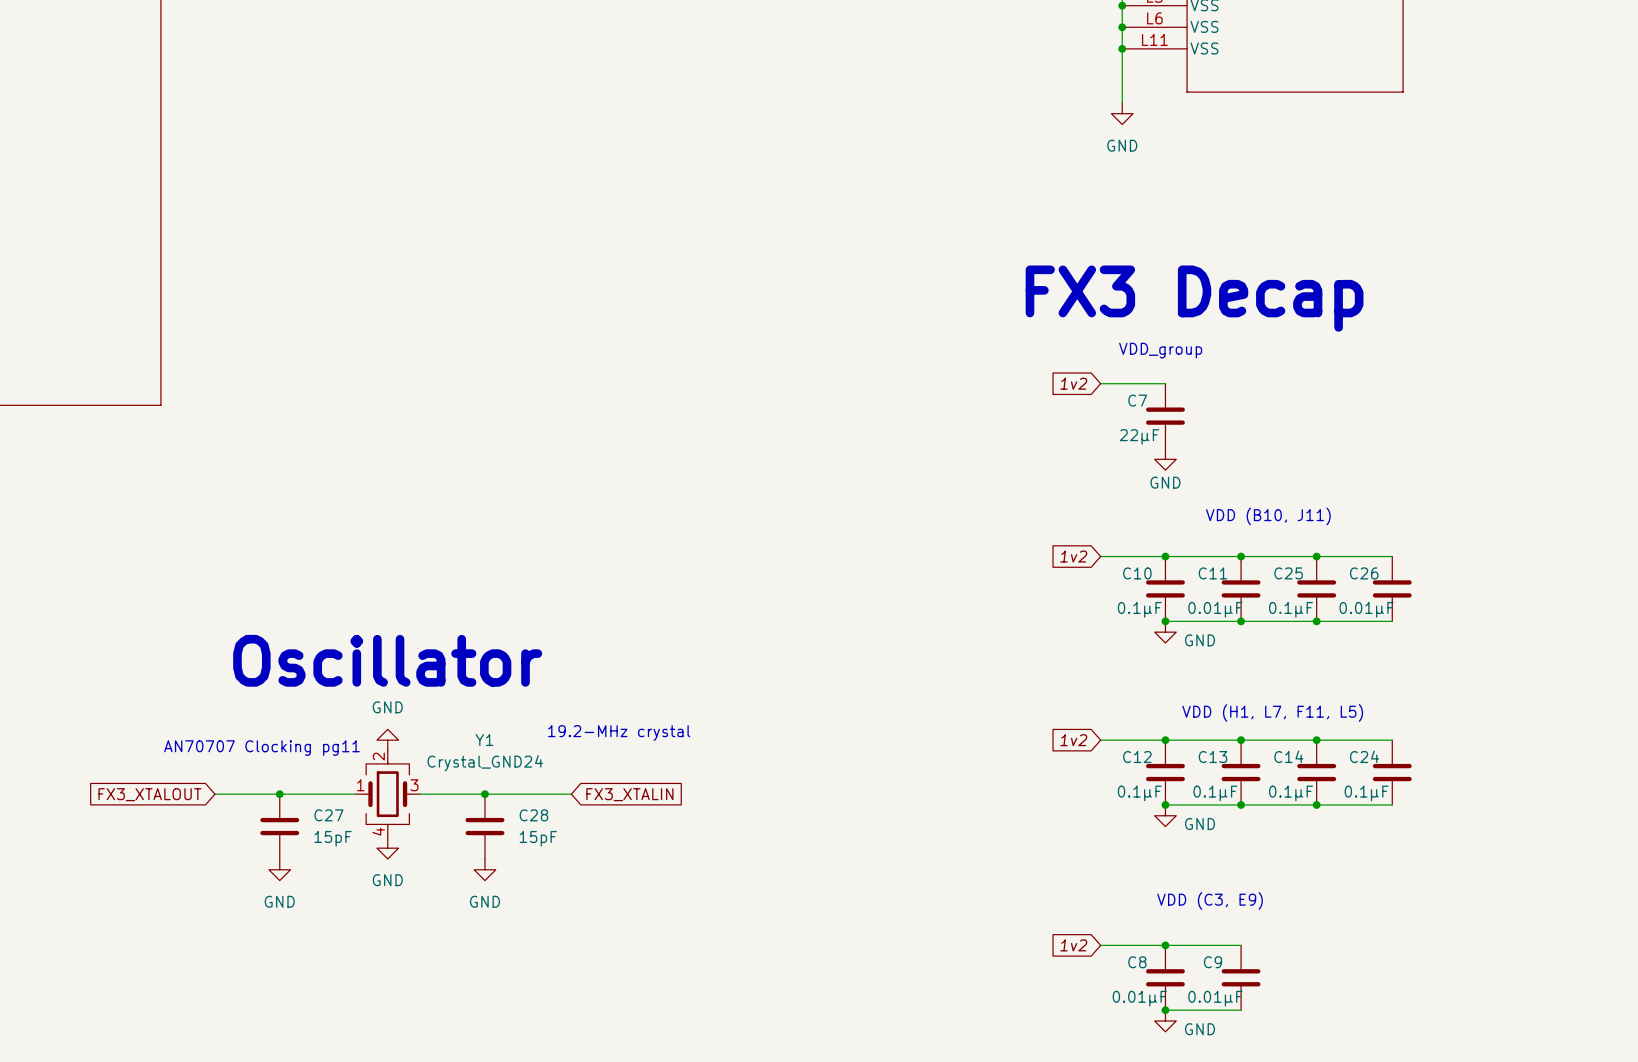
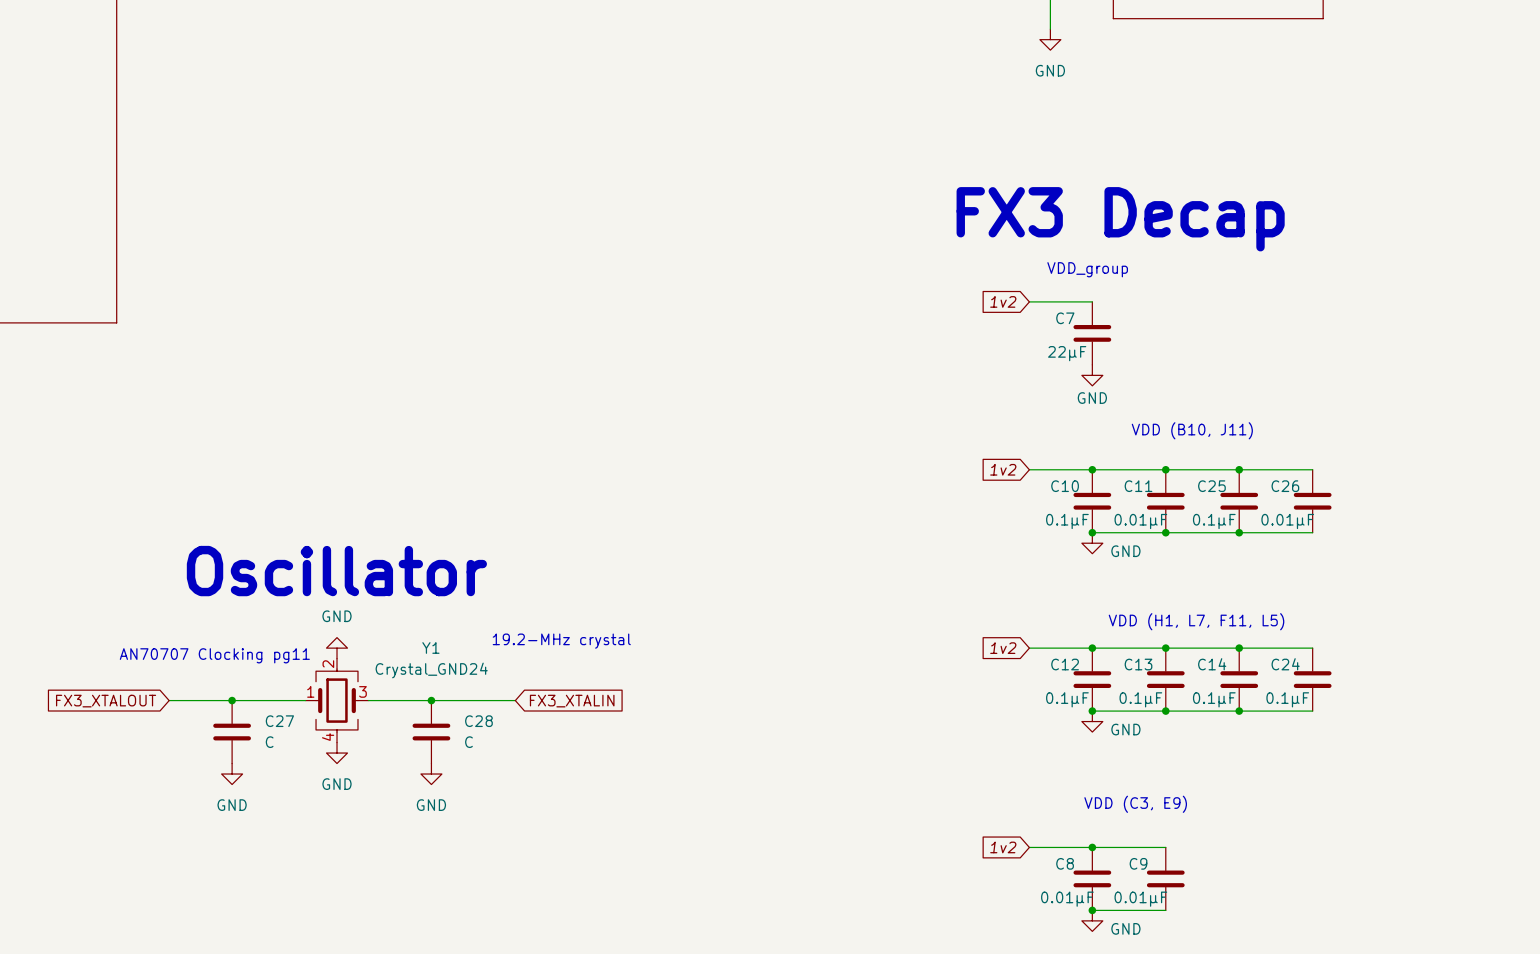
C27 value: 15pF (333, 838) -> C (269, 742)
C28 value: 15pF (538, 838) -> C (468, 742)

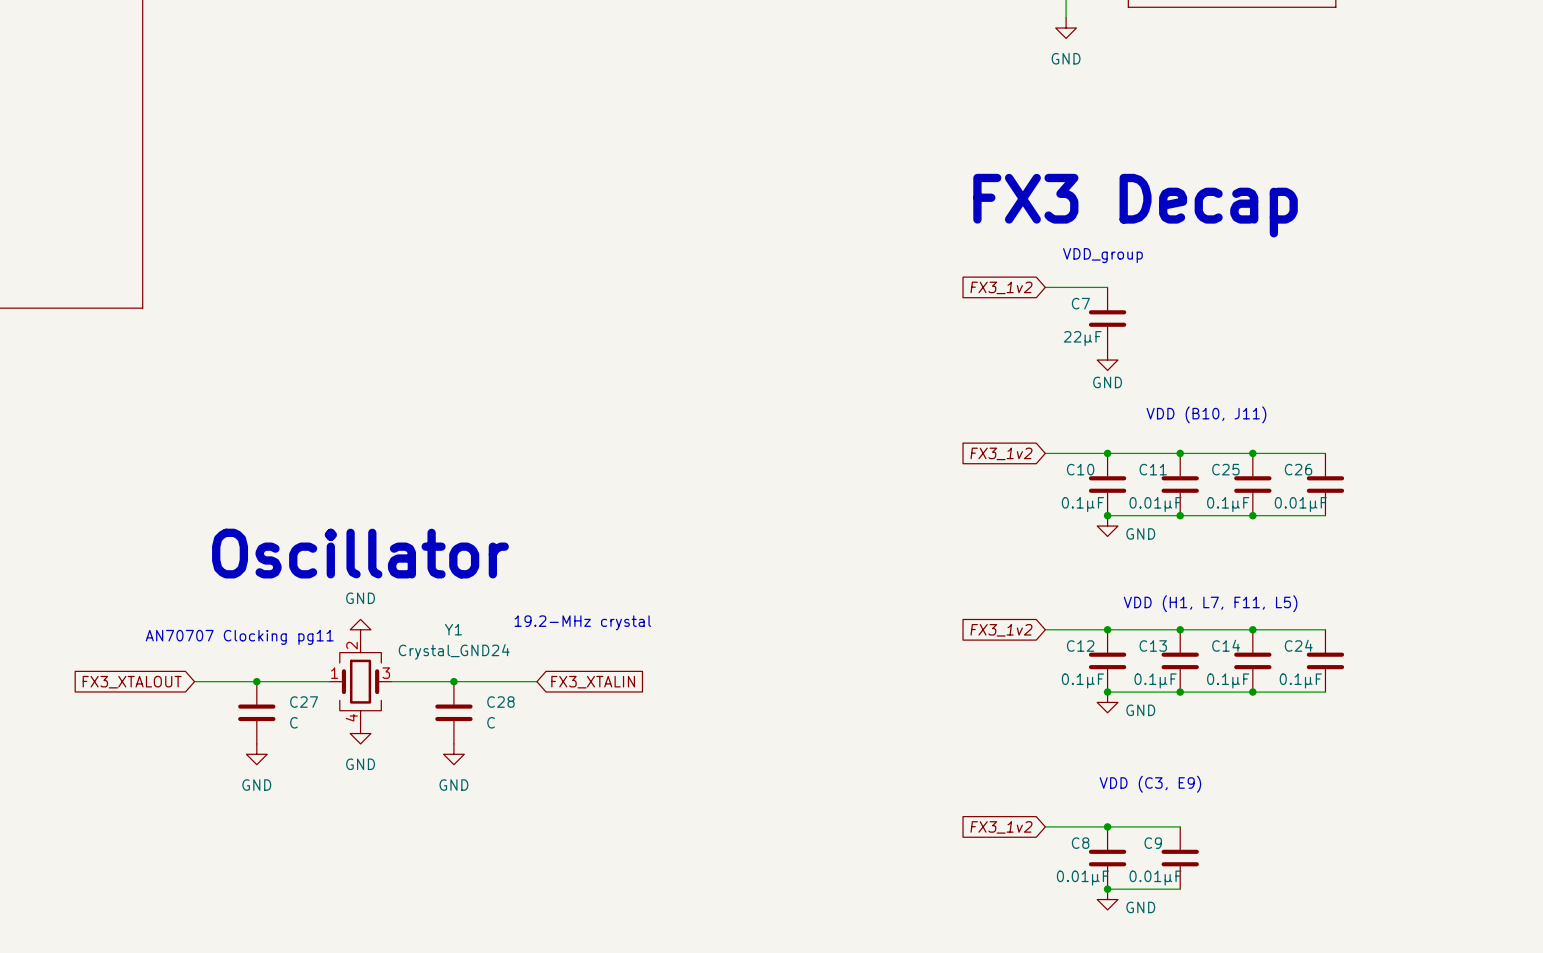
global label: 1v2 (1003, 301) -> FX3_1v2 (1001, 287)
global label: 1v2 (1003, 469) -> FX3_1v2 (1001, 453)
global label: 1v2 (1003, 648) -> FX3_1v2 (1001, 630)
global label: 1v2 (1003, 847) -> FX3_1v2 (1001, 827)

